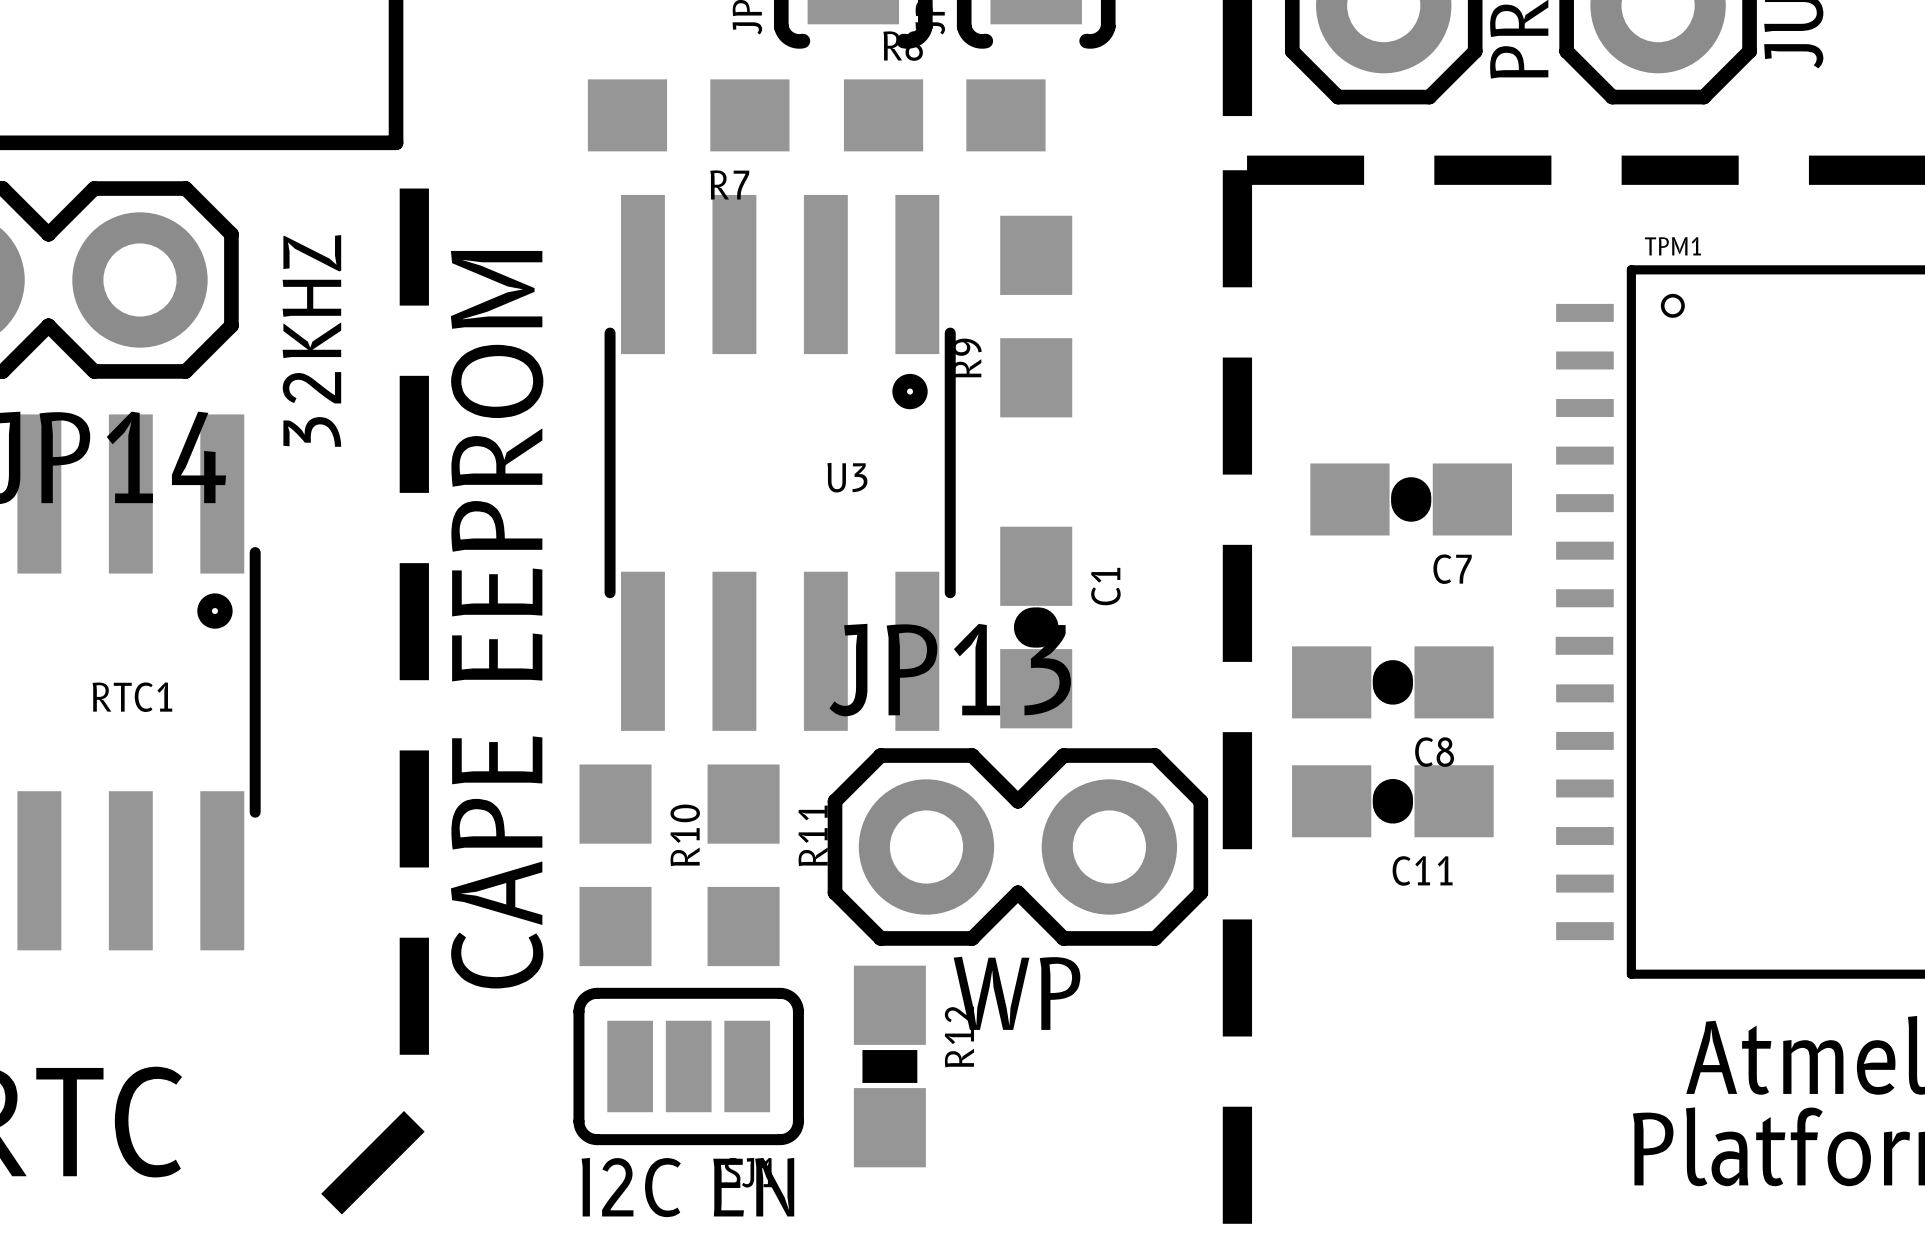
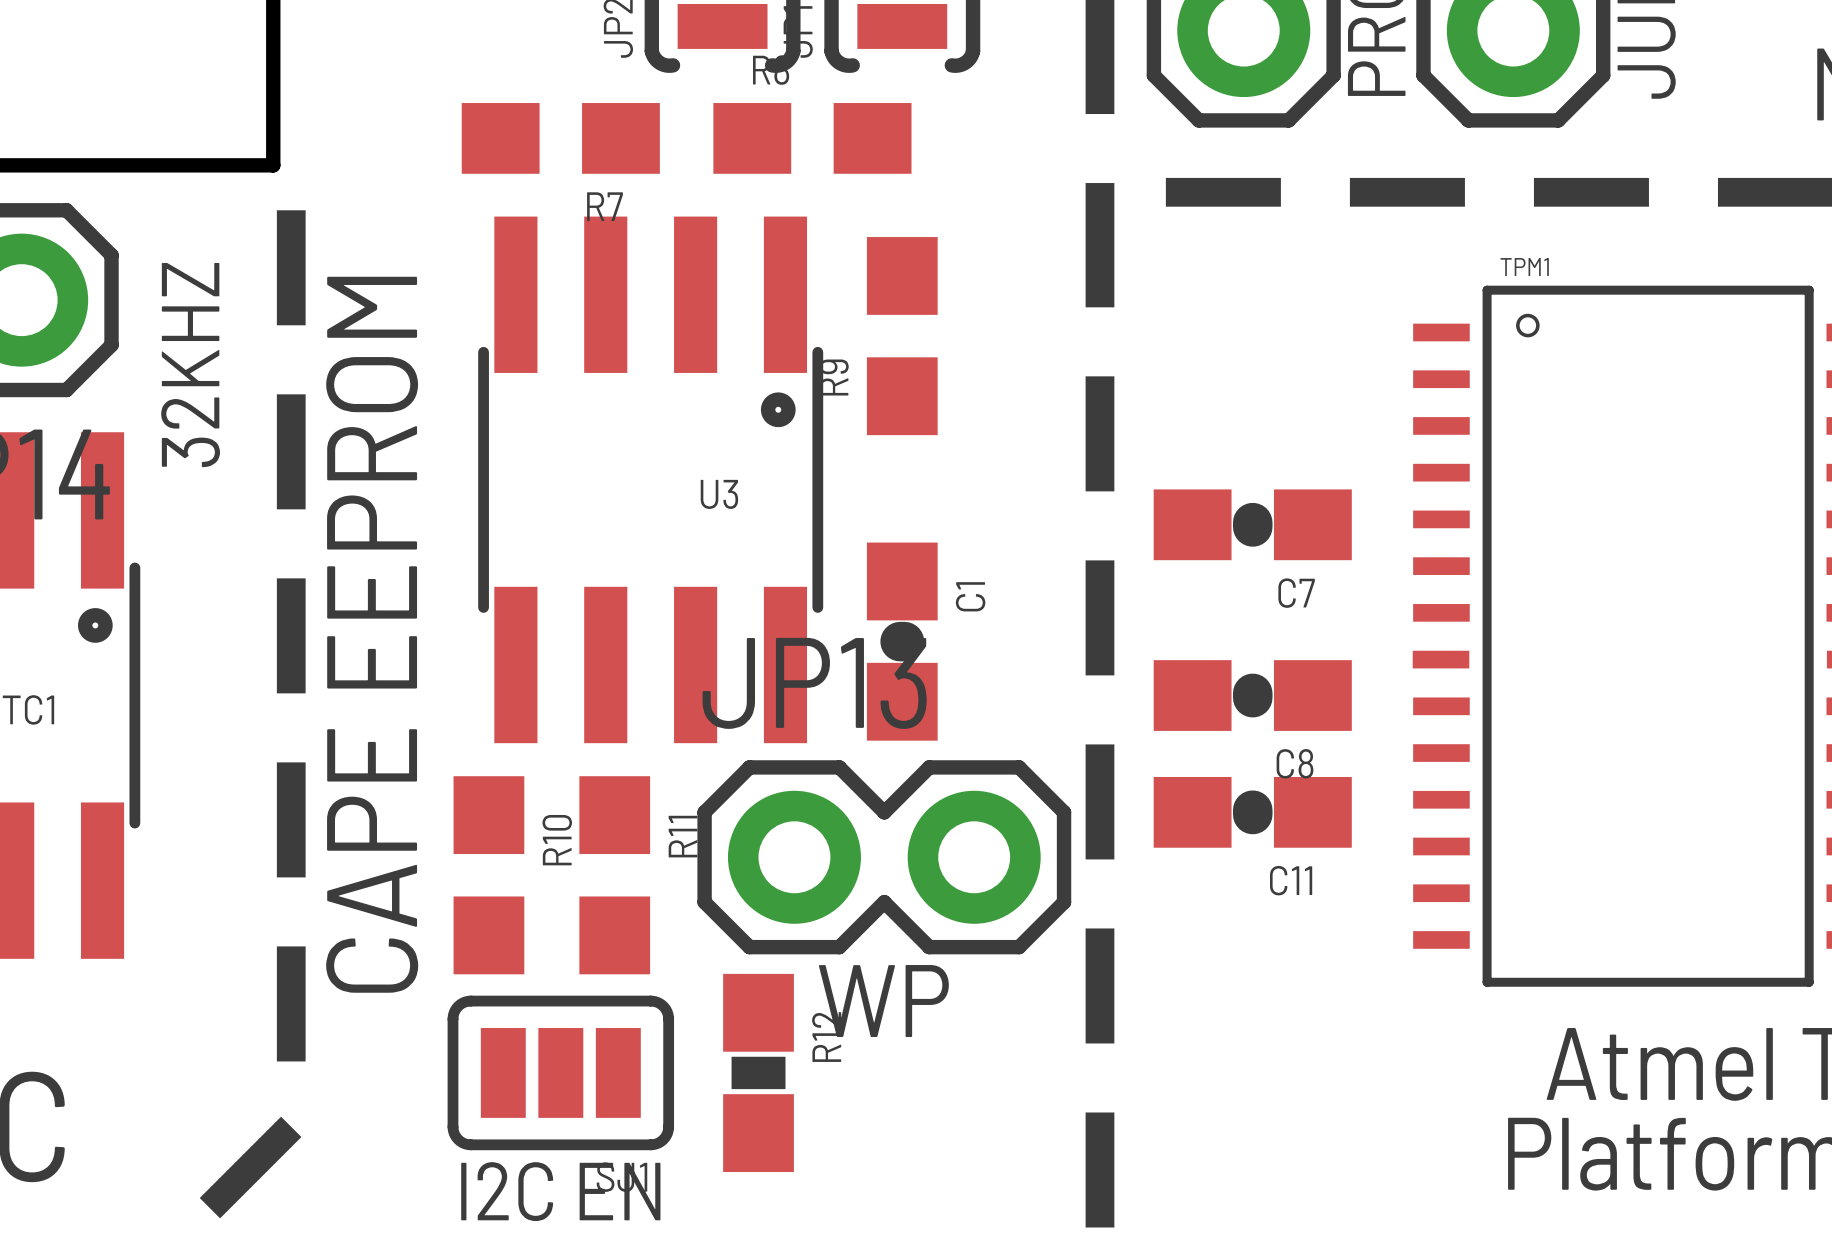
C7 position: (1411, 499) -> (1252, 524)

